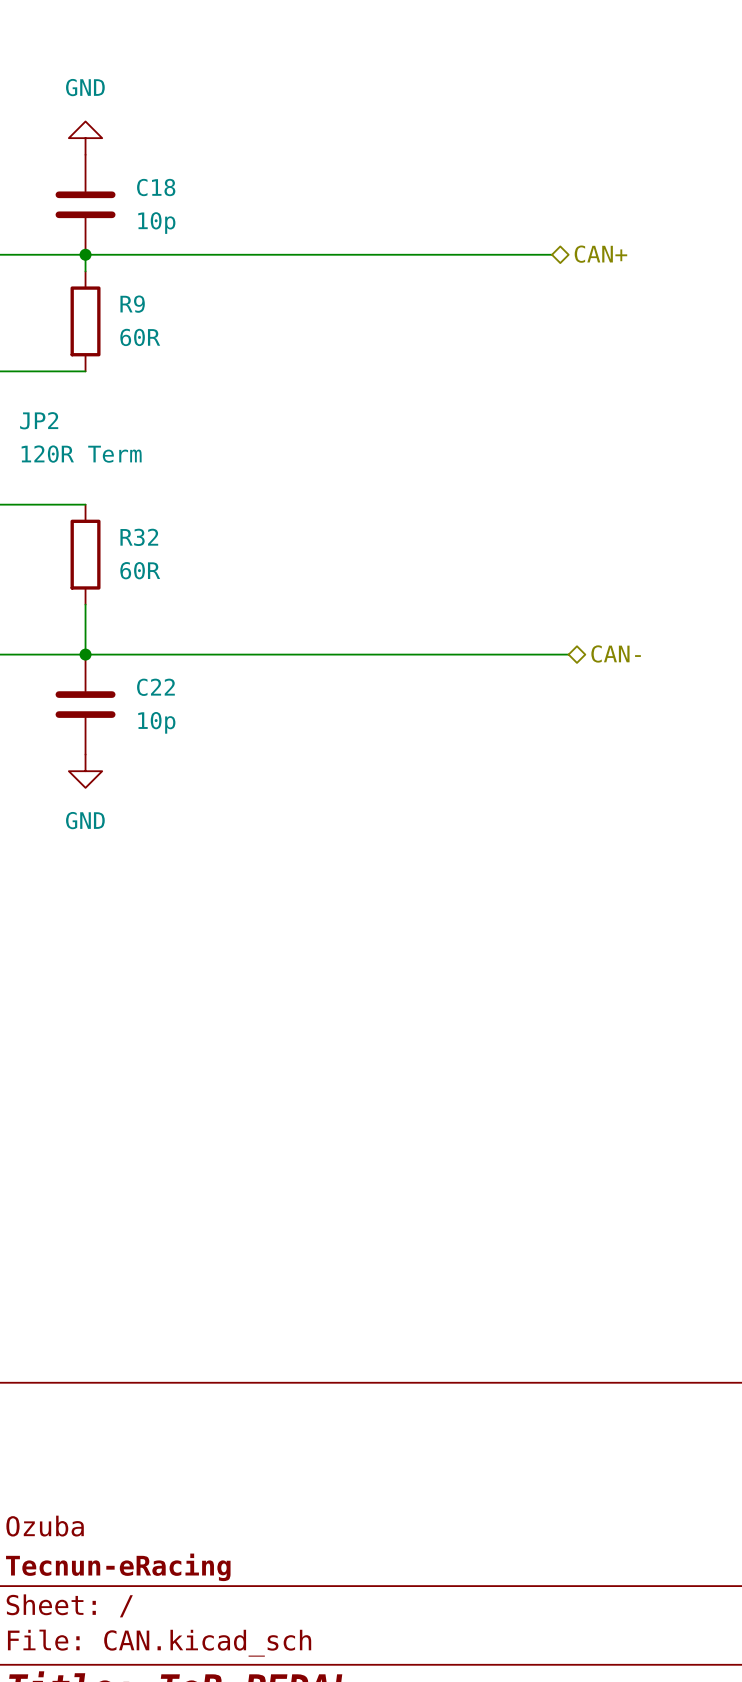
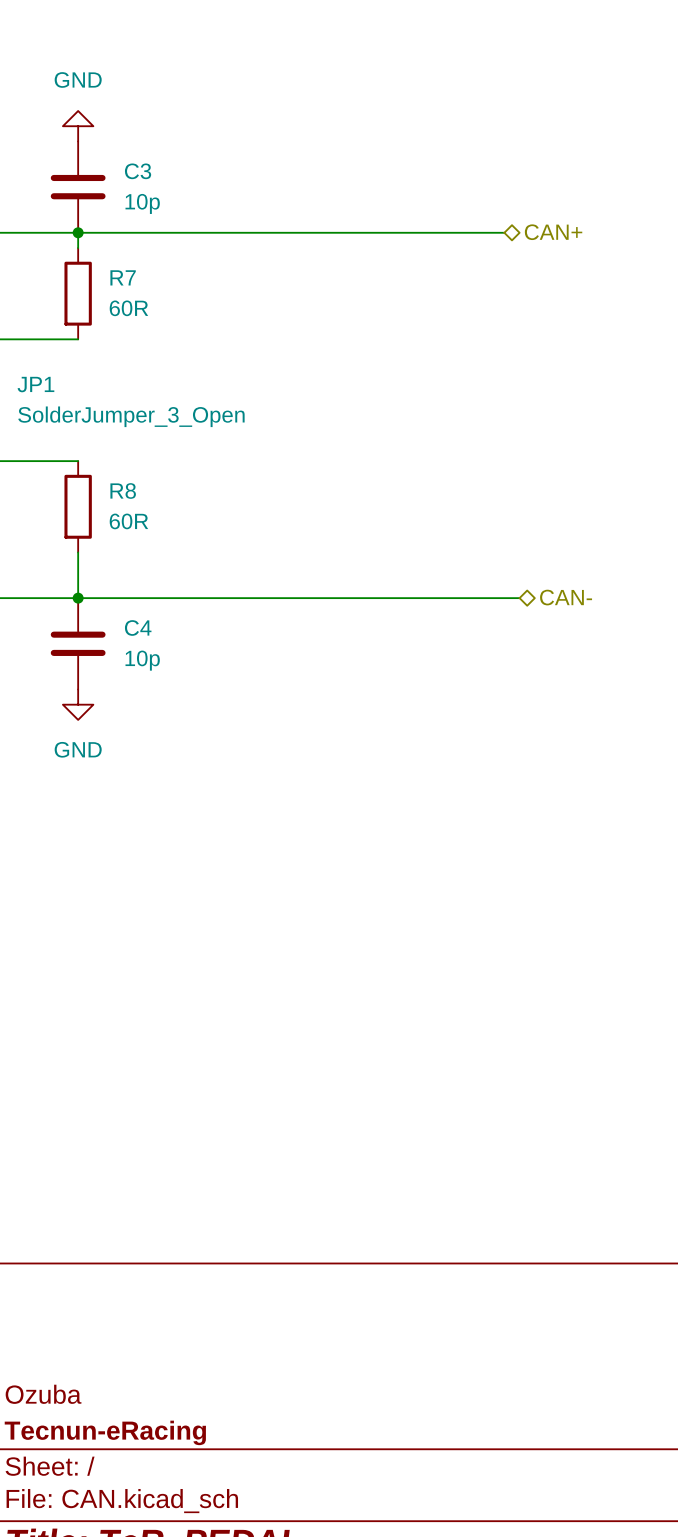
C18 name: C18 (156, 187) -> C3 (138, 171)
R9 name: R9 (132, 304) -> R7 (123, 277)
JP2 name: JP2 (39, 420) -> JP1 (35, 384)
JP2 value: 120R Term (81, 454) -> SolderJumper_3_Open (131, 416)
R32 name: R32 (139, 537) -> R8 (123, 490)
C22 name: C22 (155, 687) -> C4 (138, 627)

